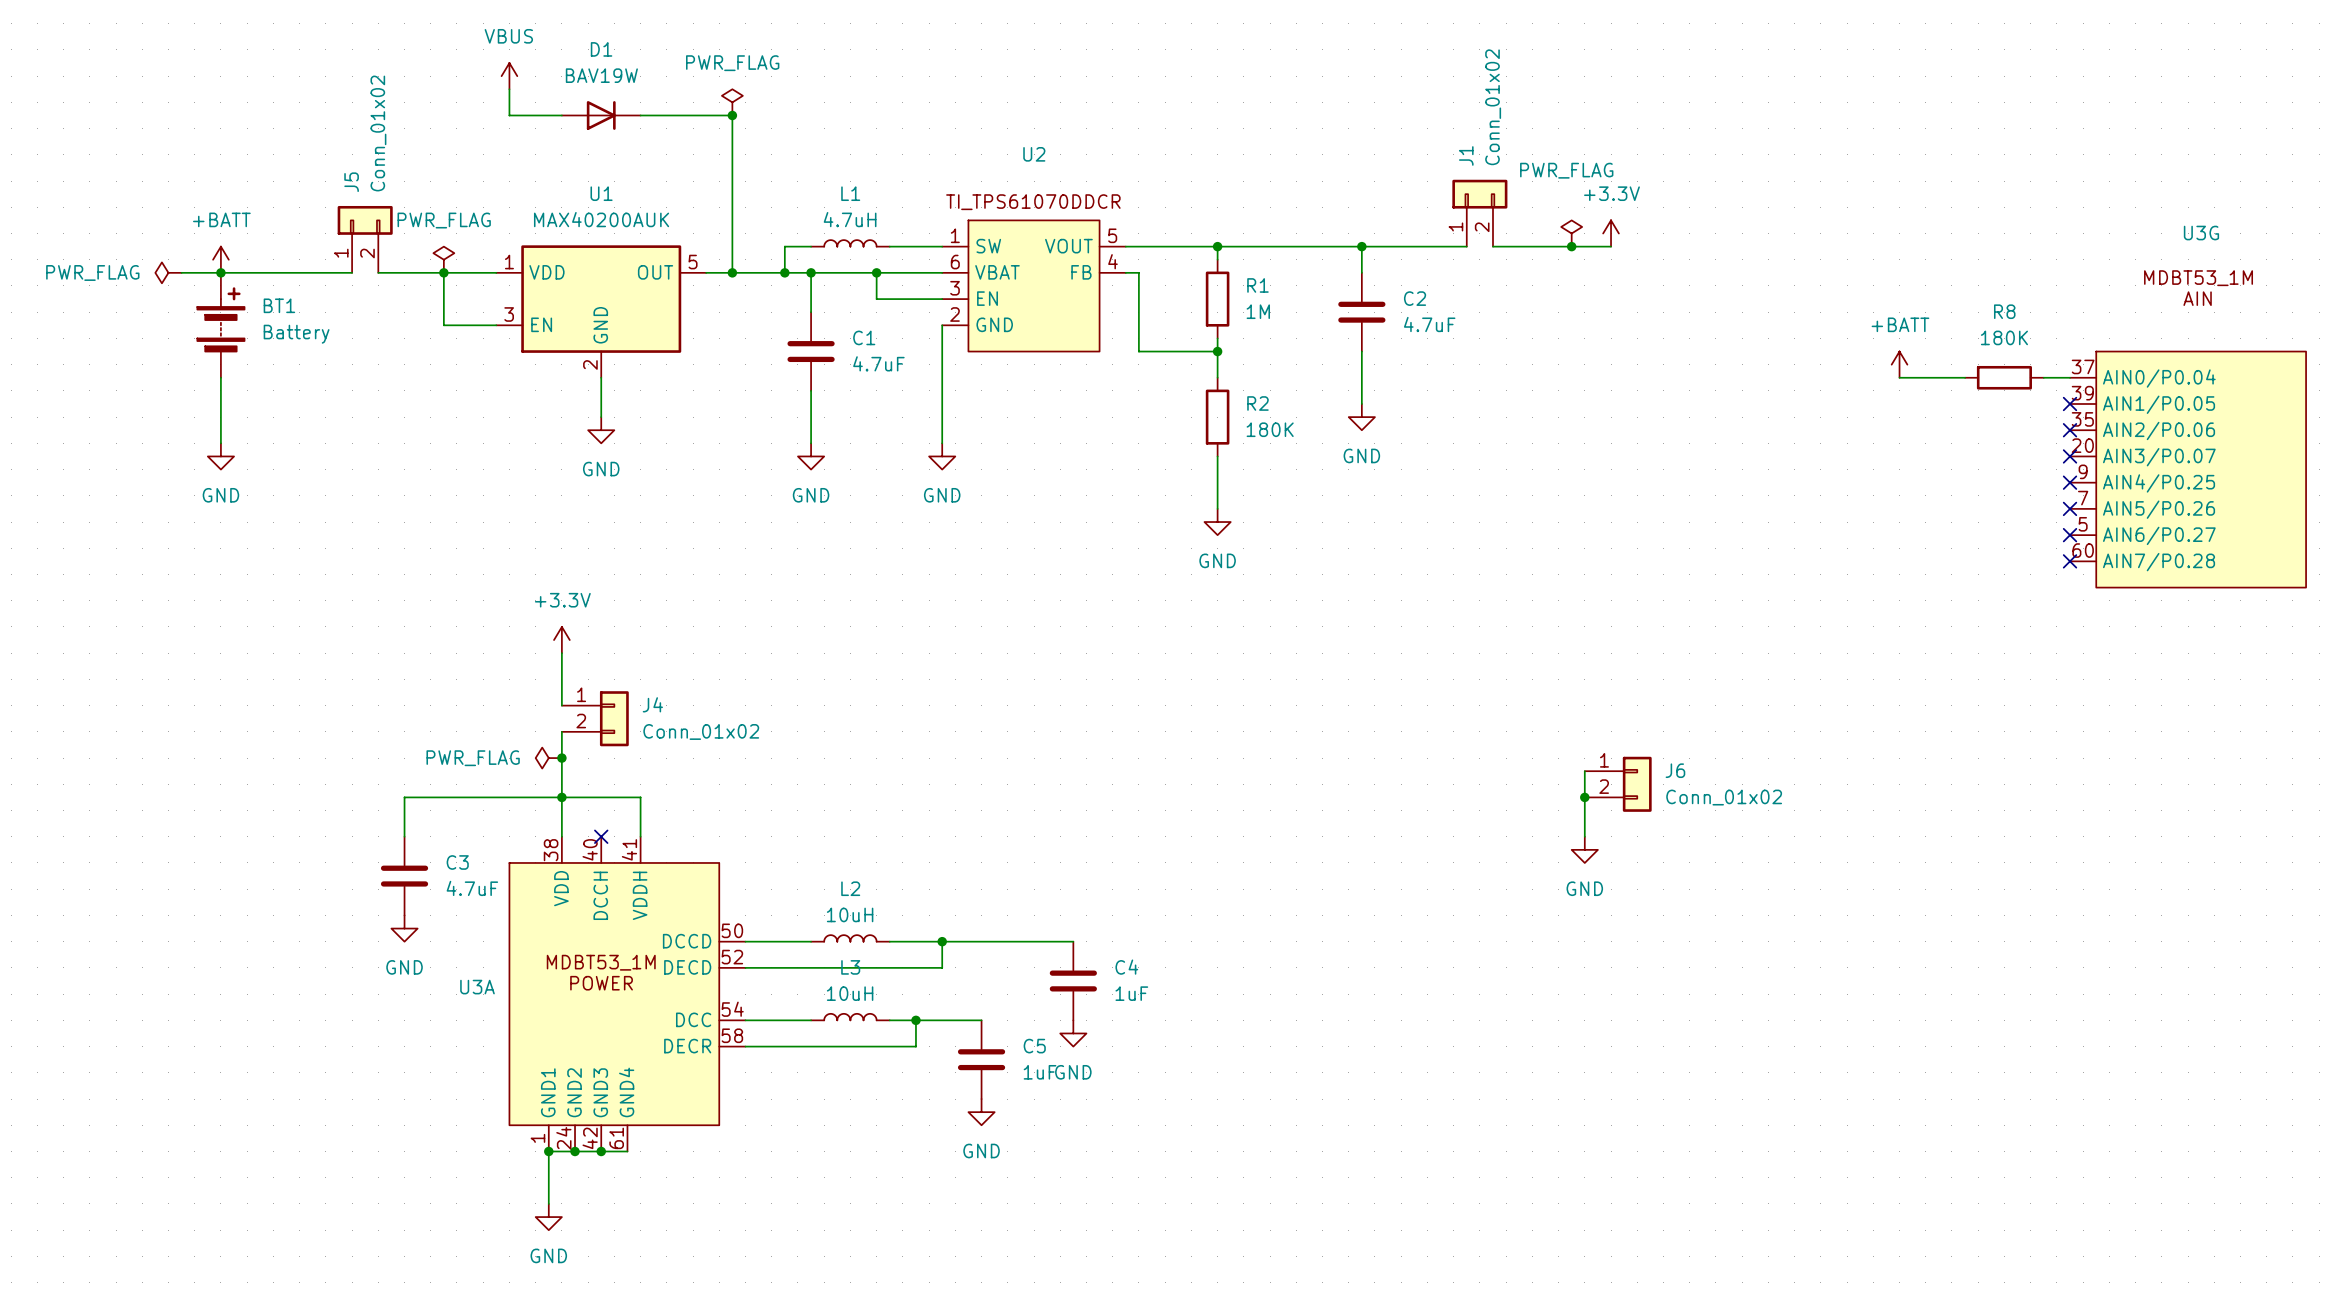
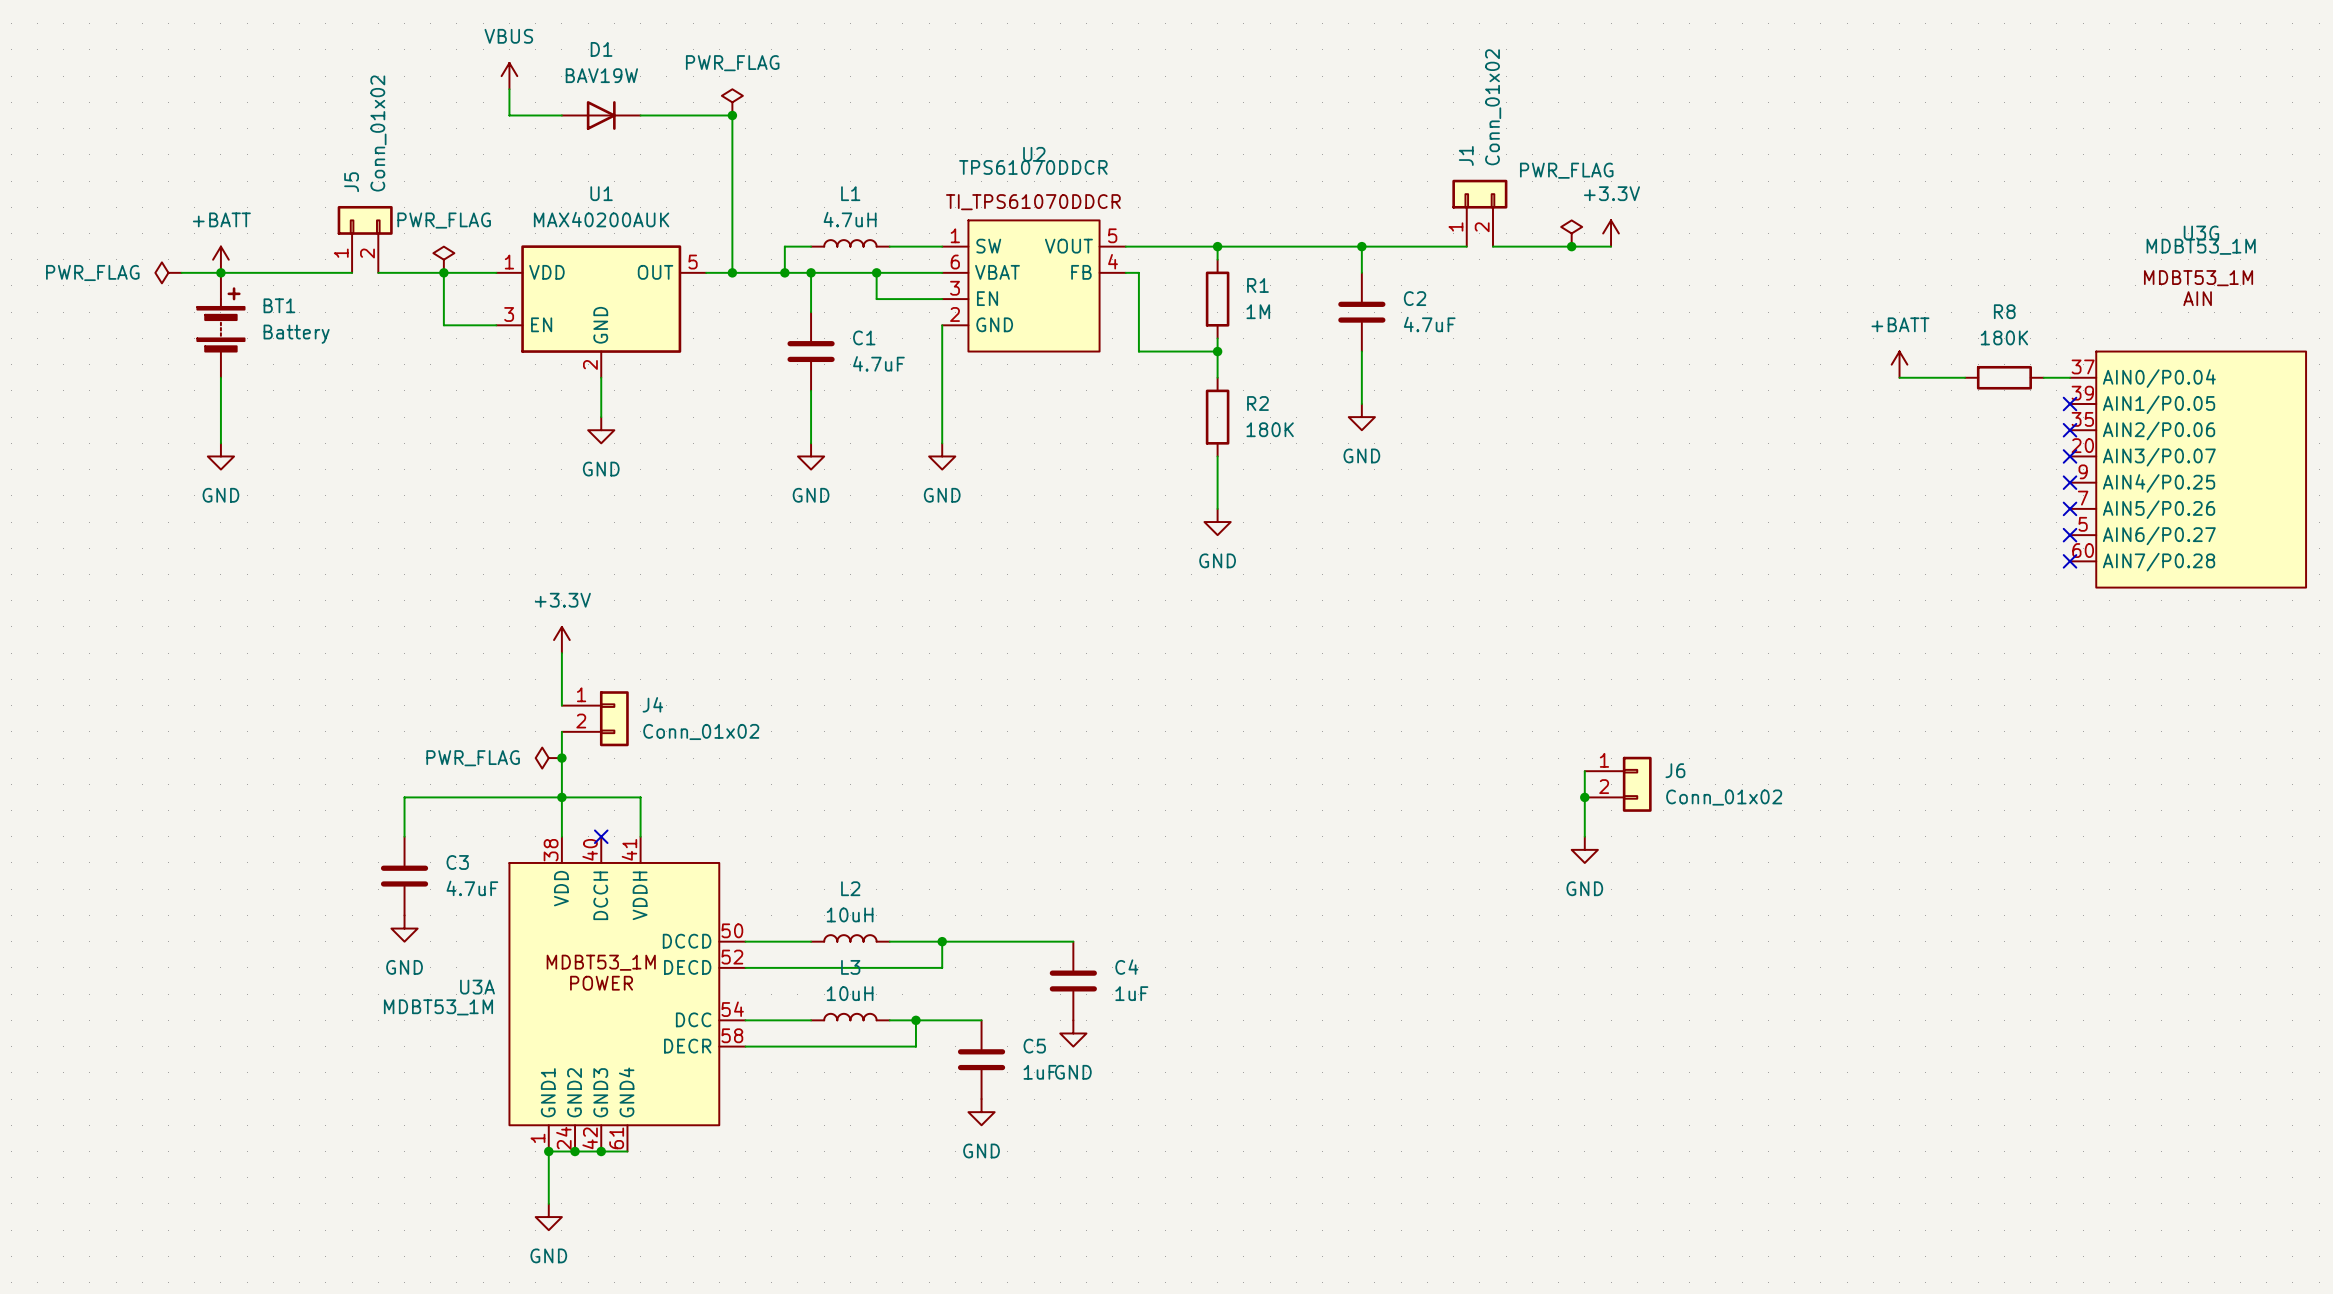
U2 value: none -> TPS61070DDCR (1033, 167)
U3G value: none -> MDBT53_1M (2201, 246)
U3A value: none -> MDBT53_1M (438, 1007)

